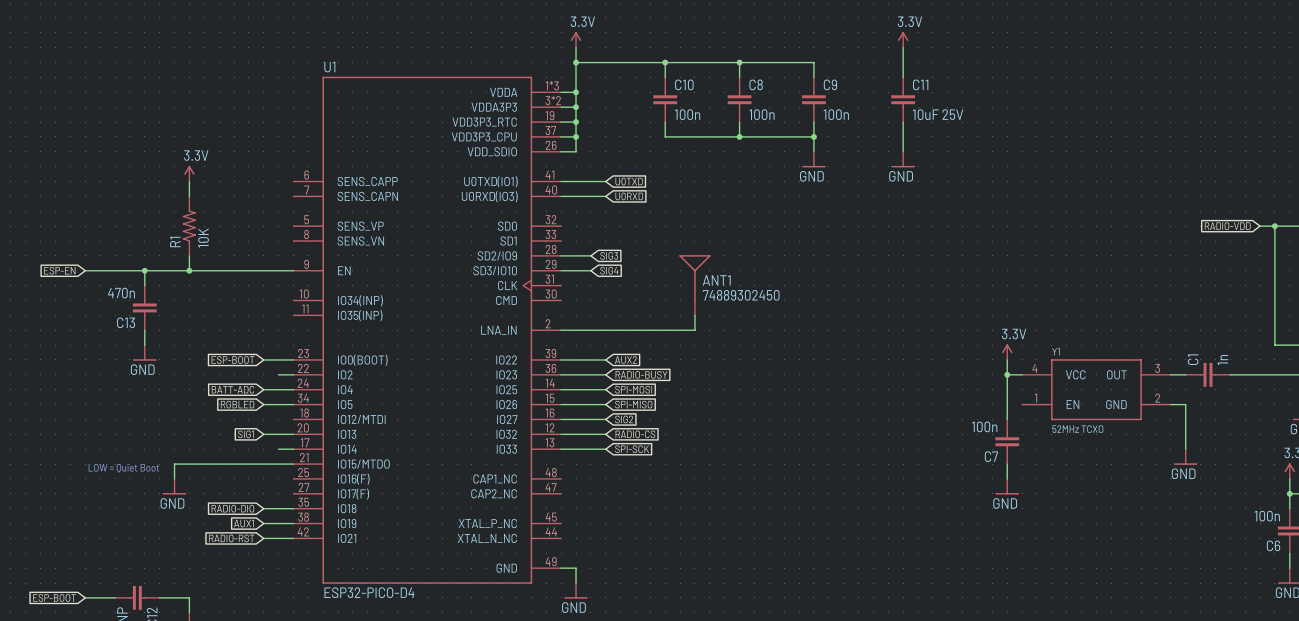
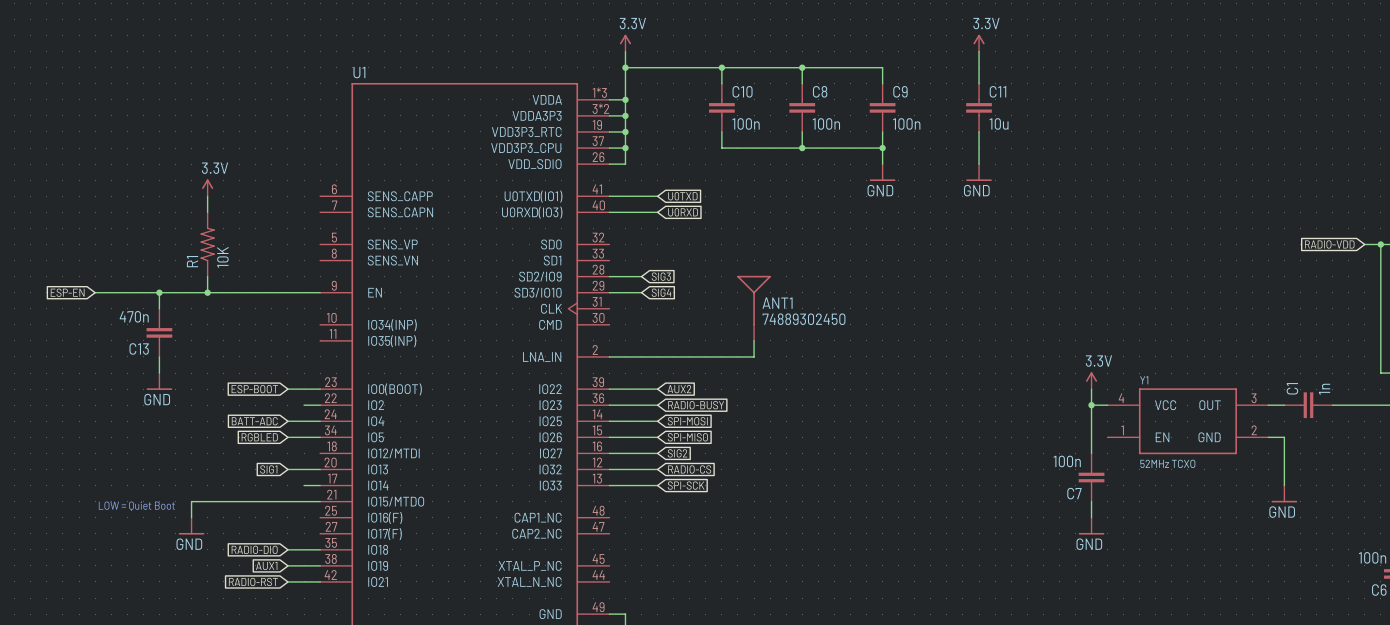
C11 value: 10uF 25V (938, 114) -> 10u (999, 123)

